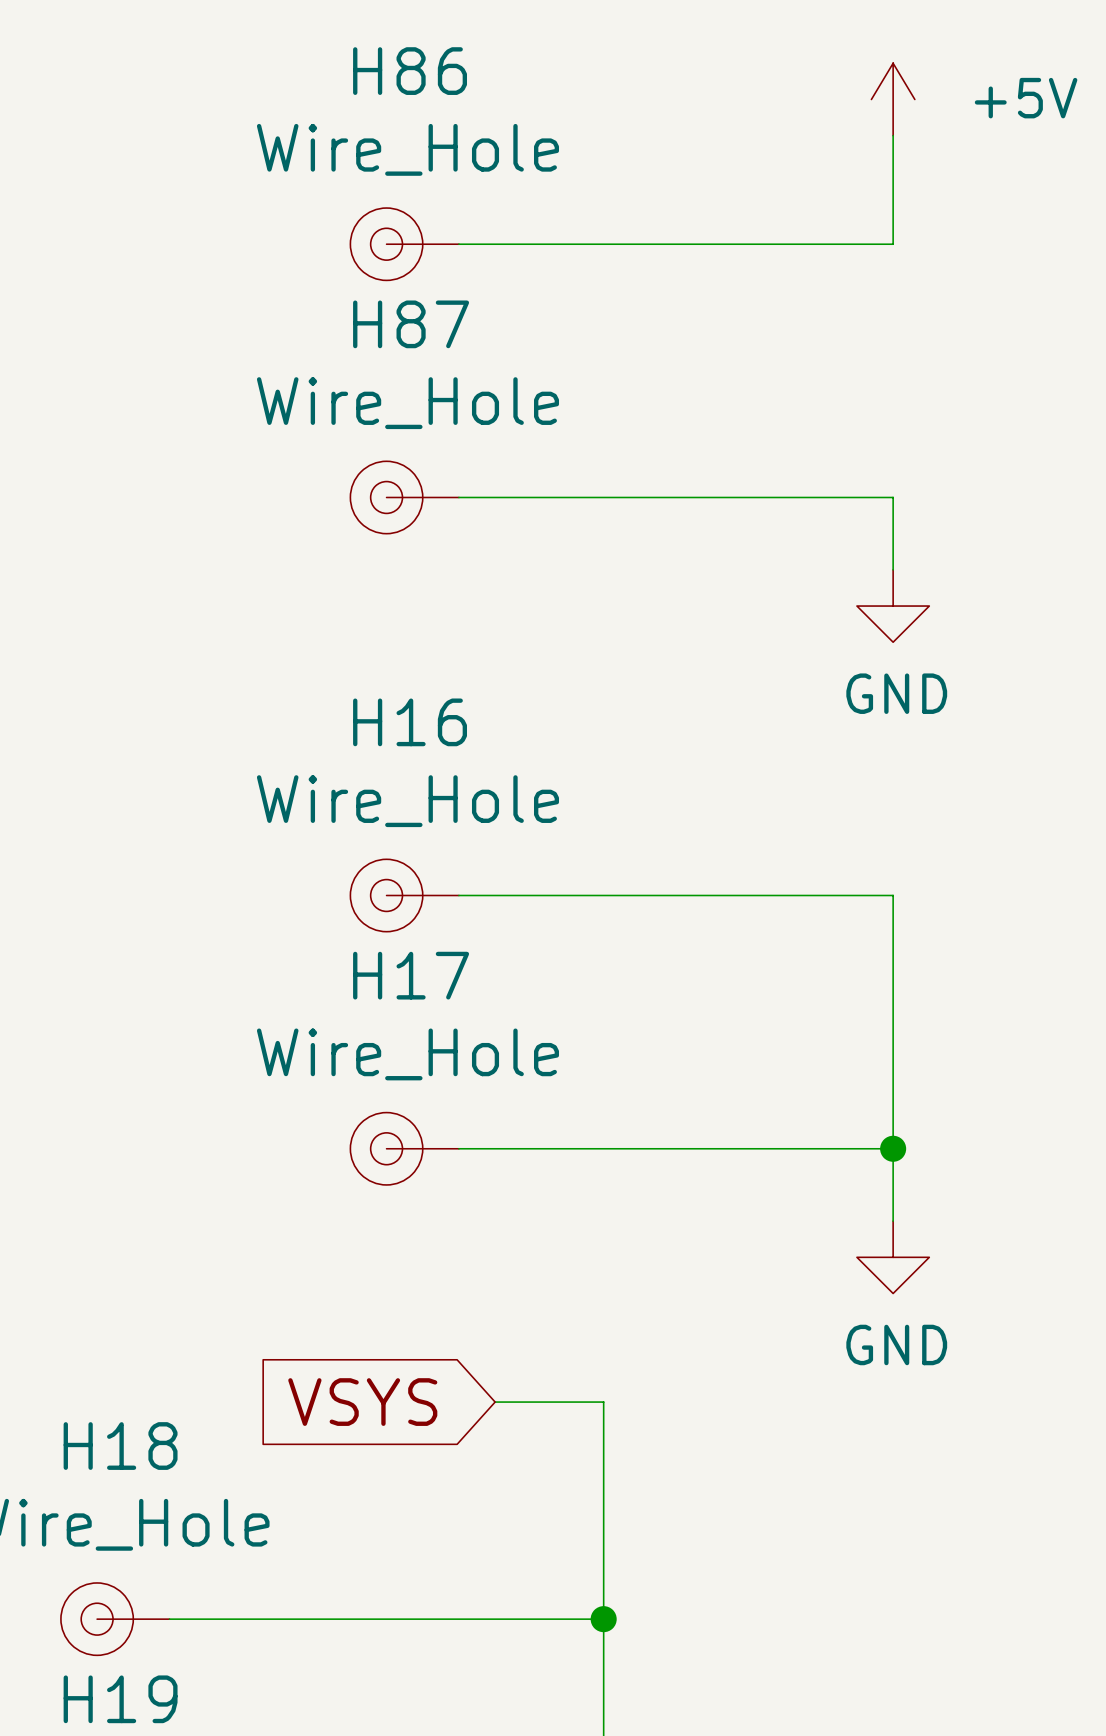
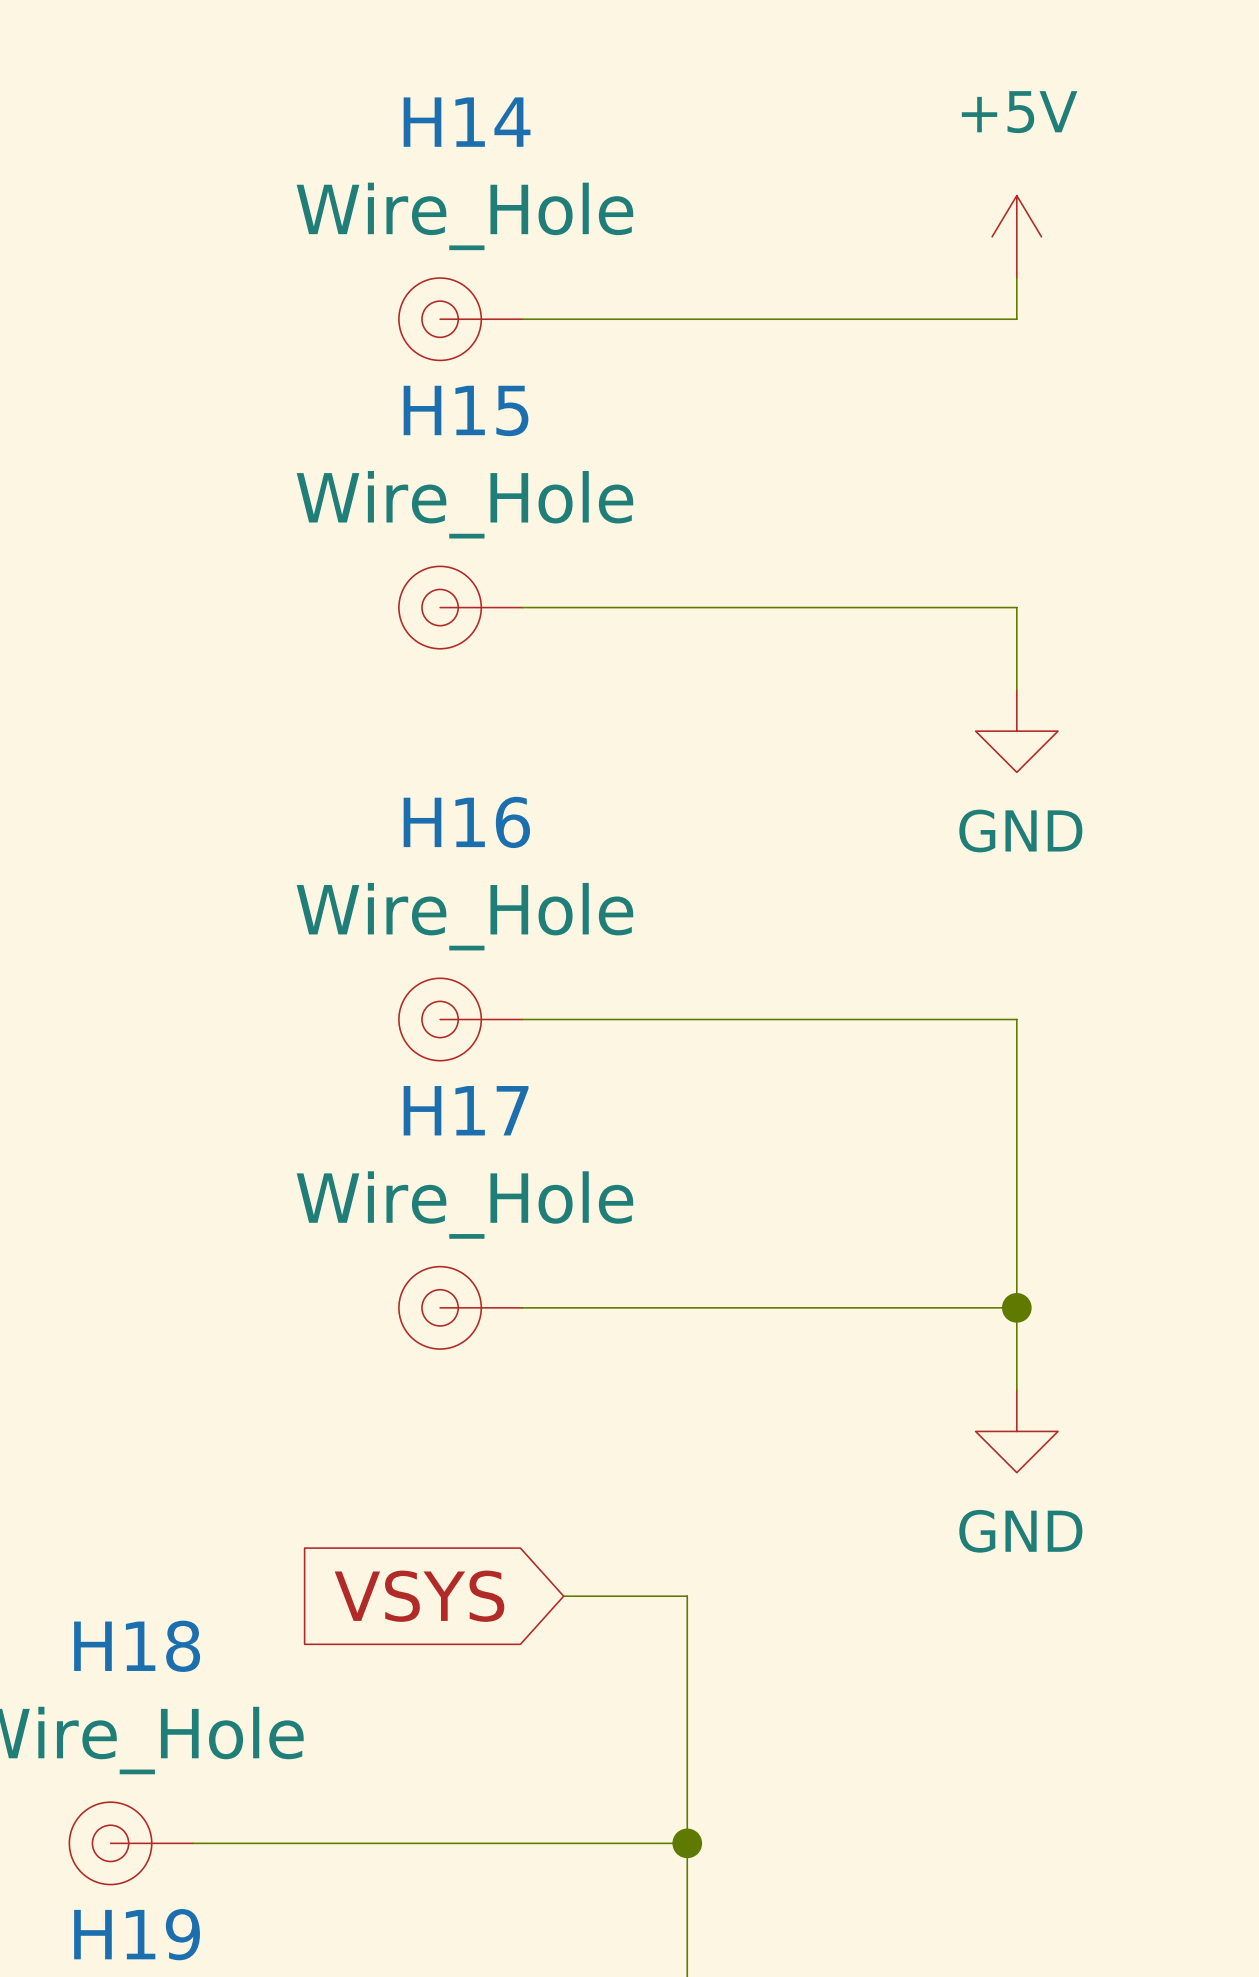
power symbol text position: +5V (1026, 98) -> +5V (1019, 112)
power symbol position: +5V (893, 99) -> +5V (1016, 236)
wire: (893, 135) (893, 244) (458, 244) -> none
H86: Wire_Hole (404, 244) -> none
wire: none -> (1016, 278) (1016, 319) (522, 319)
H14: none -> Wire_Hole (460, 319)
H87: Wire_Hole (404, 497) -> none
wire: (458, 497) (893, 497) (893, 533) -> (522, 607) (1016, 607)
H15: none -> Wire_Hole (460, 607)
power symbol position: GND (893, 606) -> GND (1016, 731)

